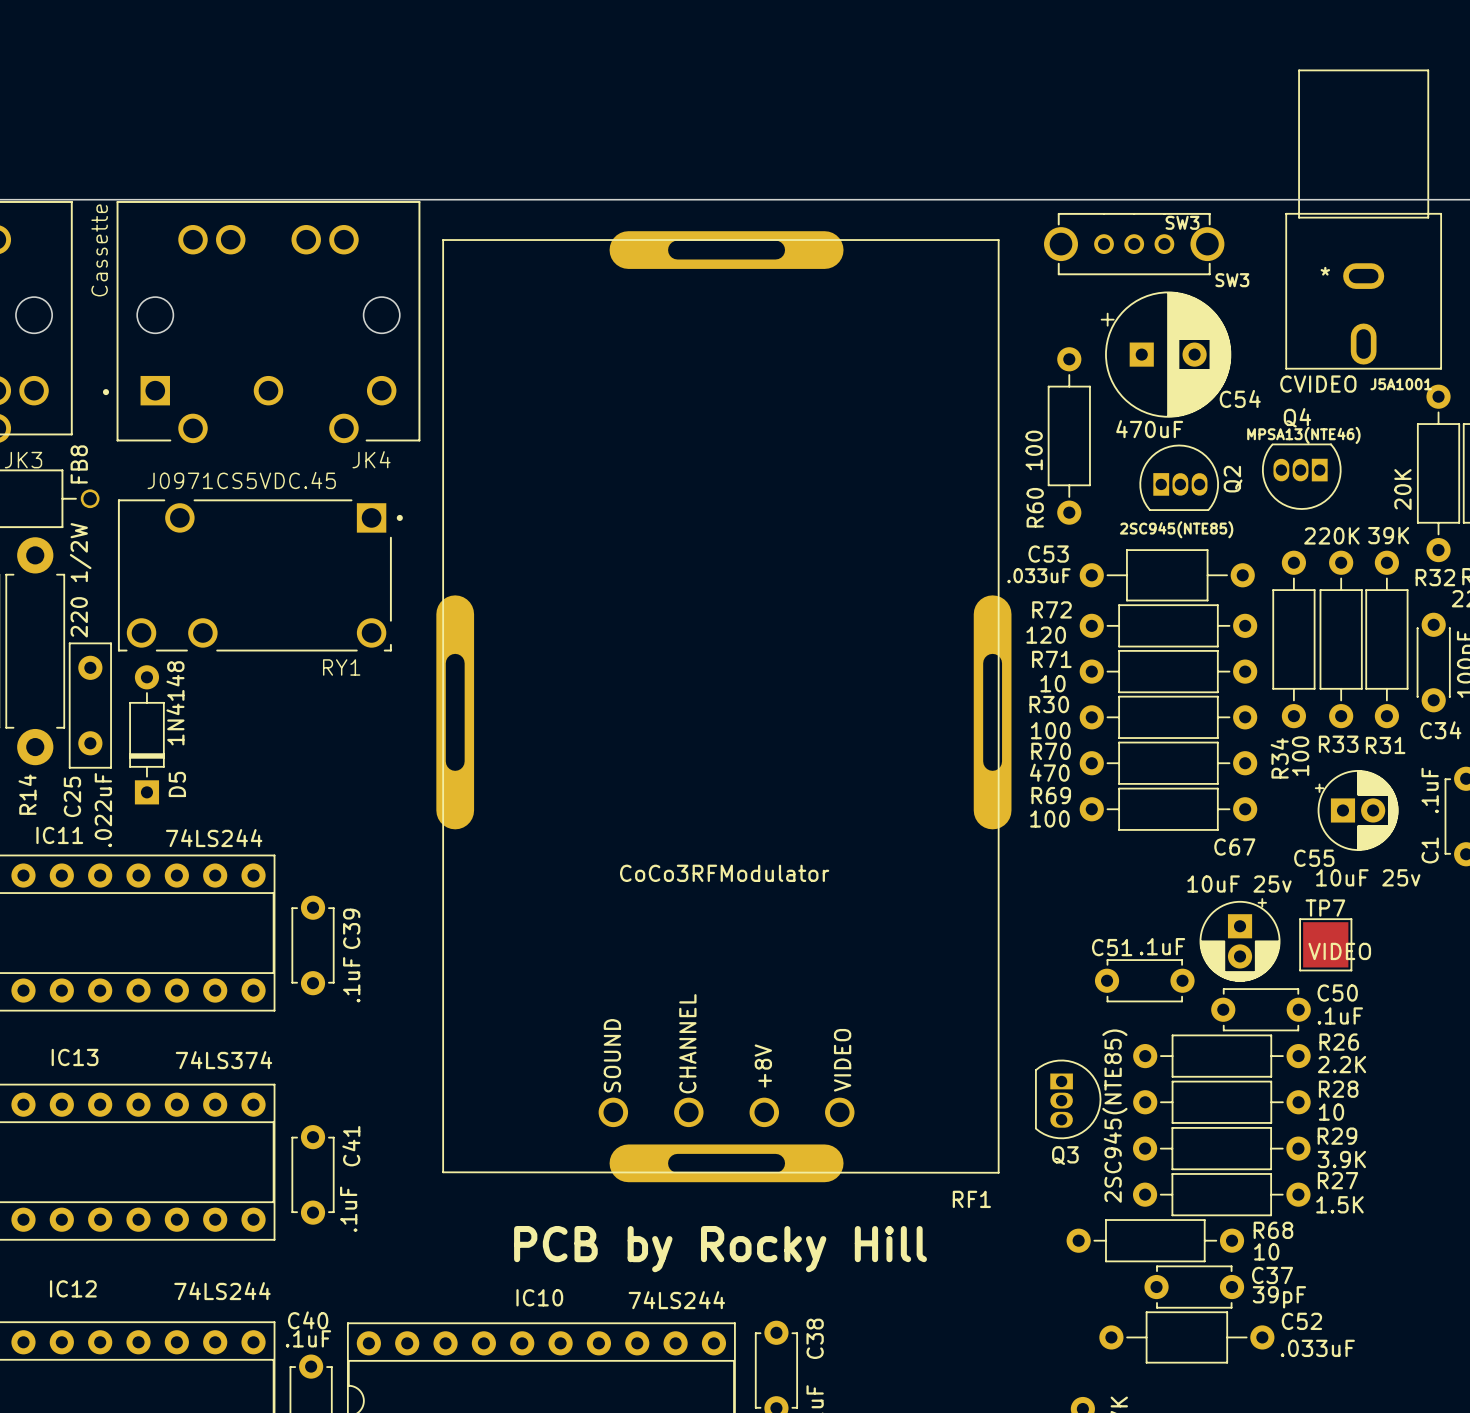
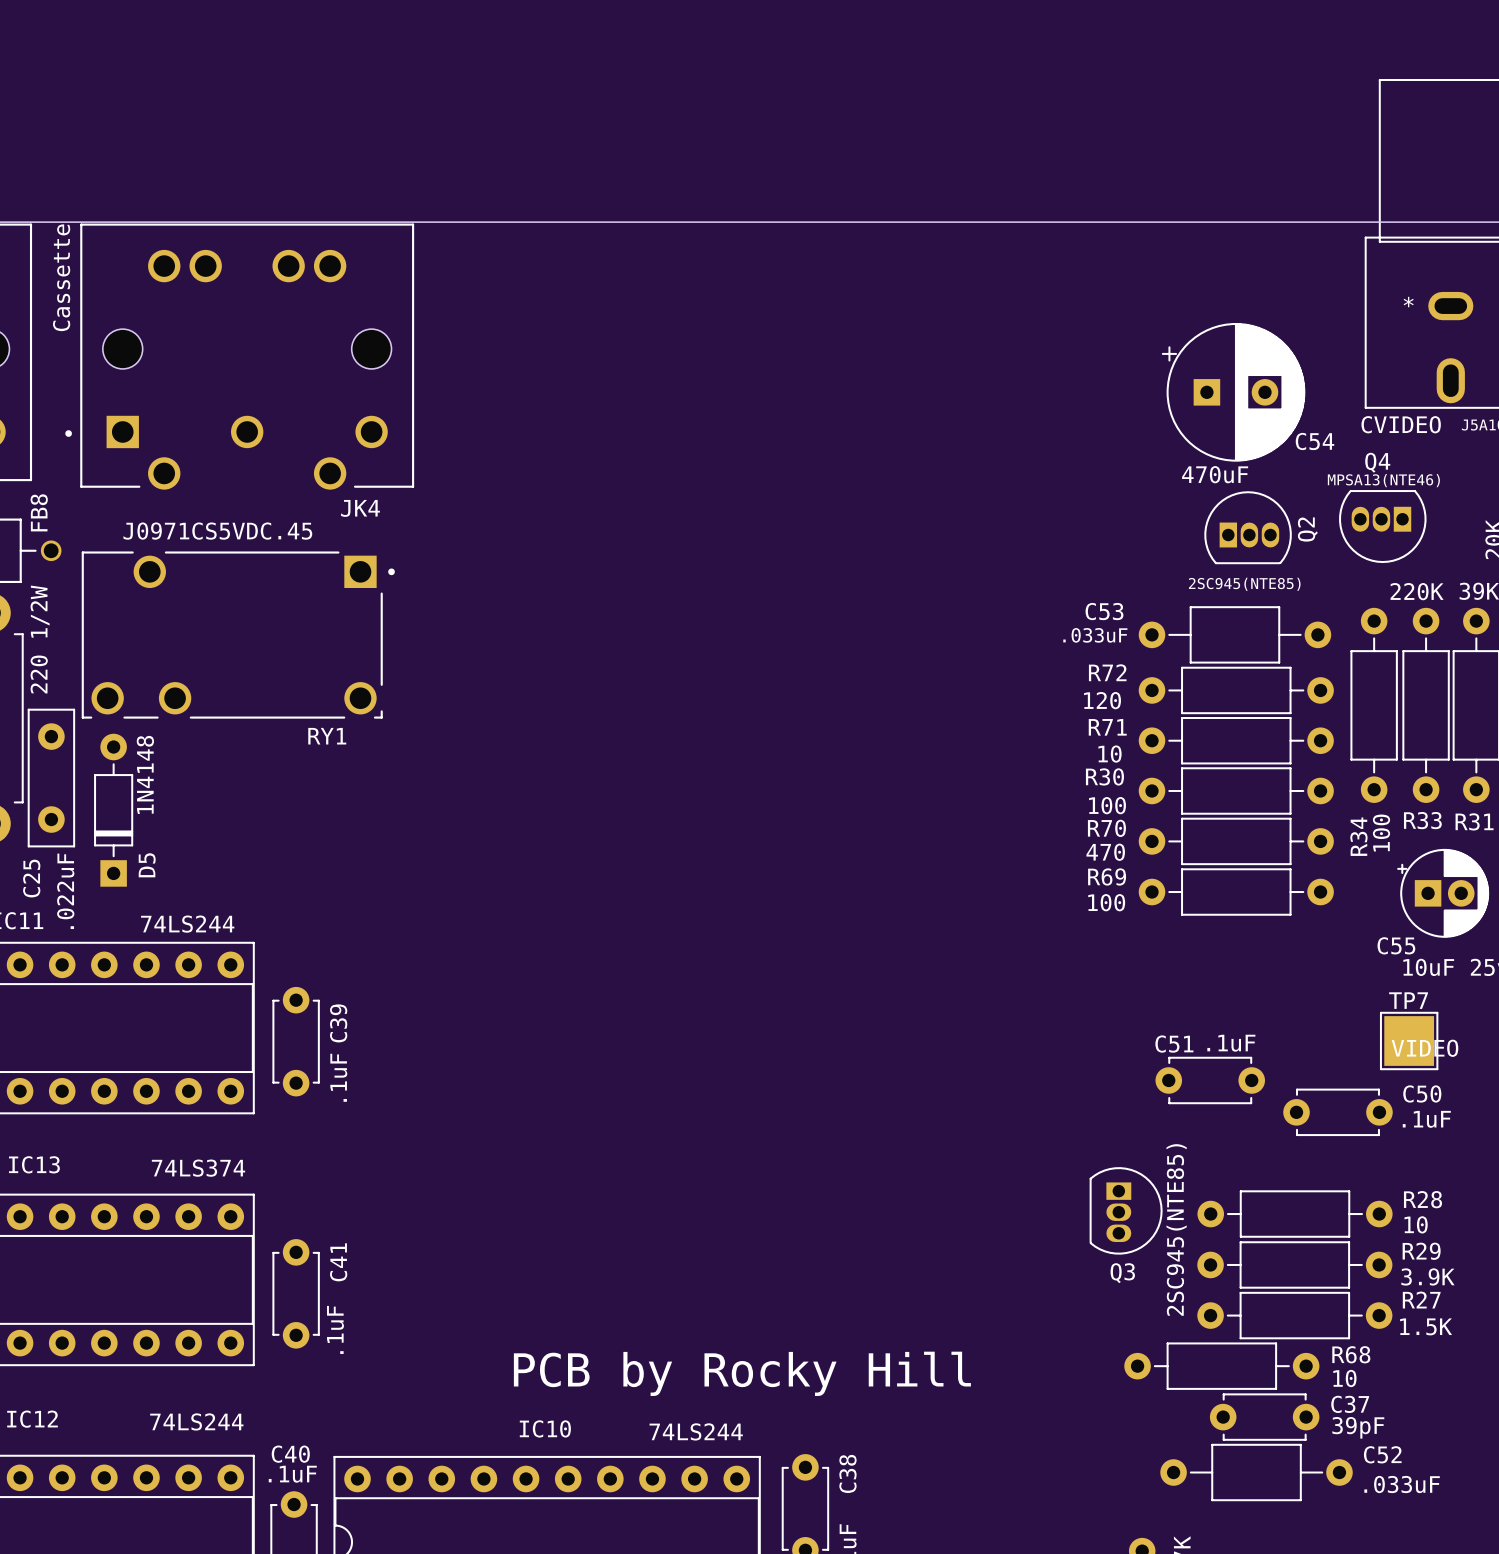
SW3: SW3 (1134, 244) -> none
R60: 100 (1069, 435) -> none
RF1: CoCo3RFModulator (723, 706) -> none
C67: 10uF 25v (1240, 939) -> none
R26: 2.2K (1221, 1056) -> none

